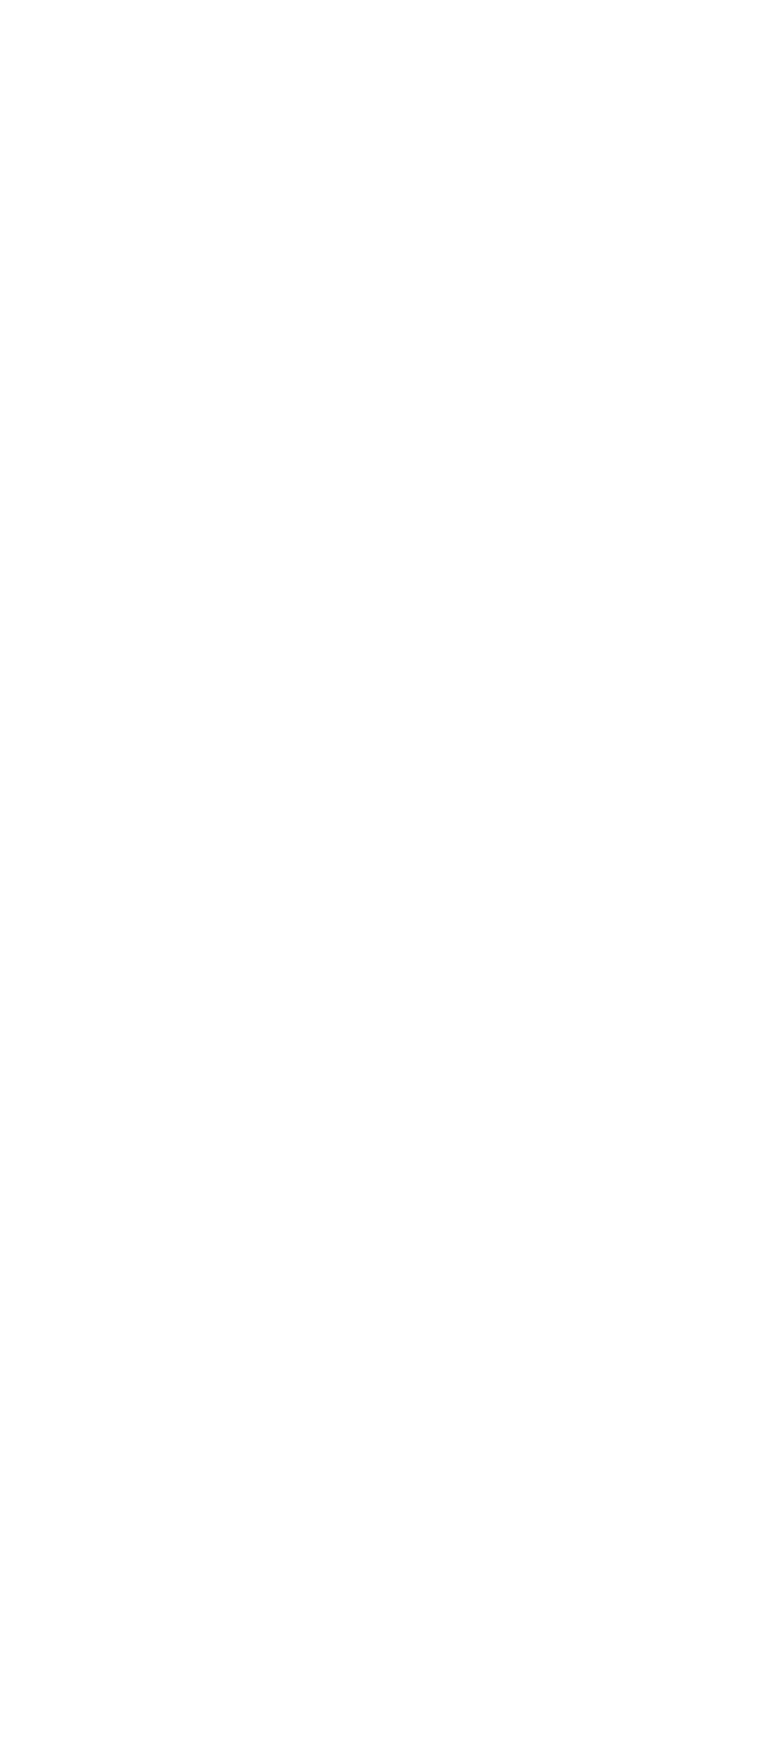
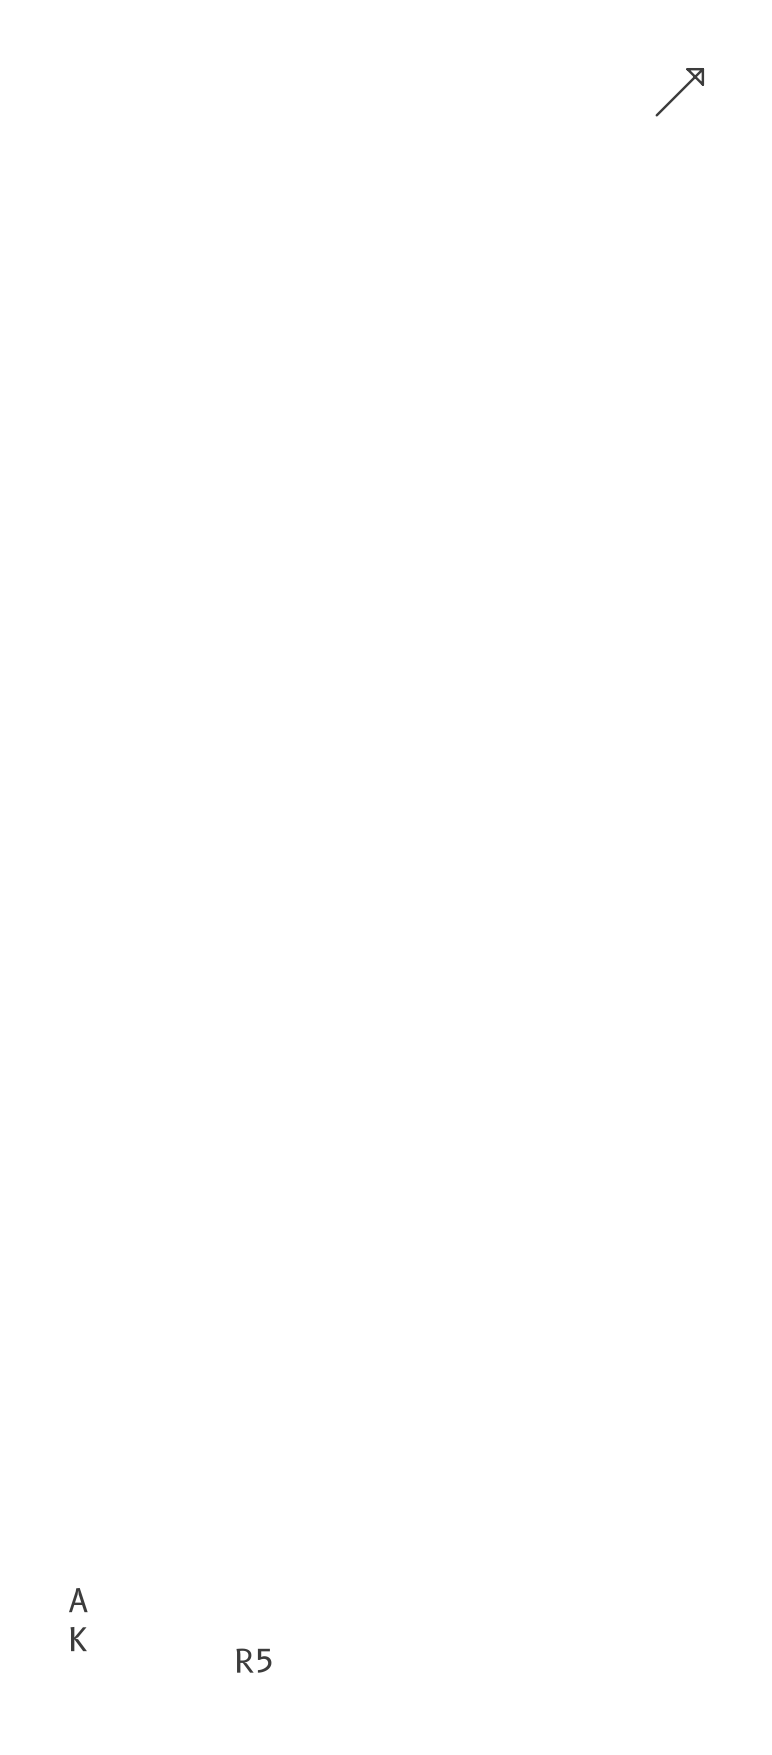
line: none -> (702, 69) (687, 69) (702, 84) (702, 69)
line: none -> (702, 69) (656, 115)
text: none -> A (78, 1600)
text: none -> K (78, 1639)
text: none -> R5 (253, 1660)

